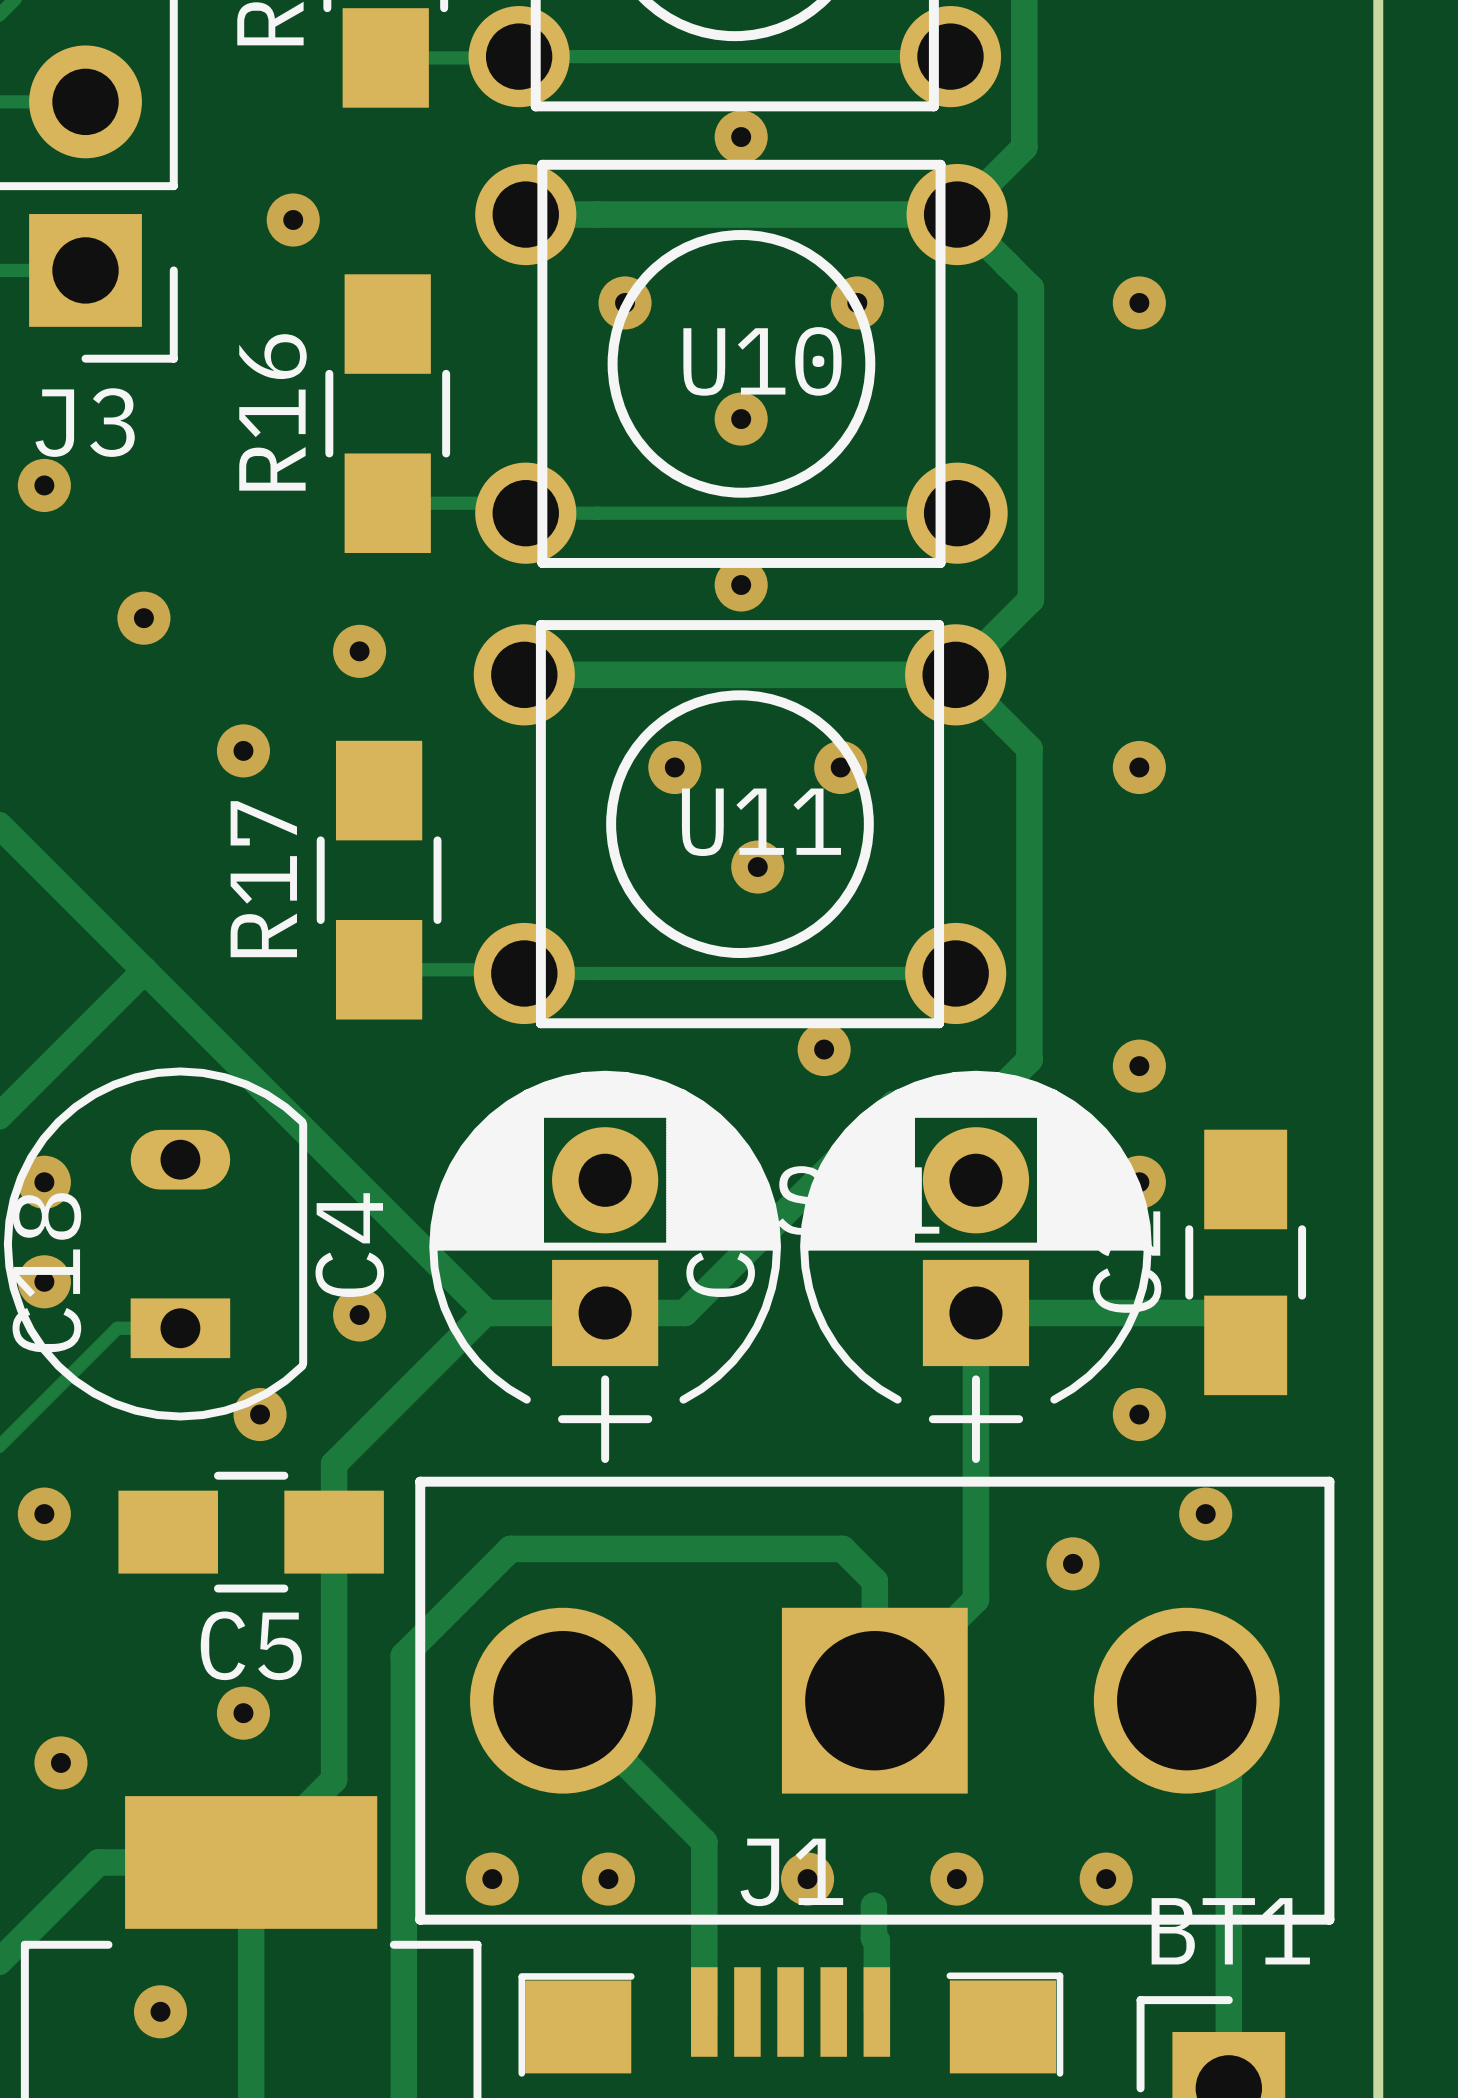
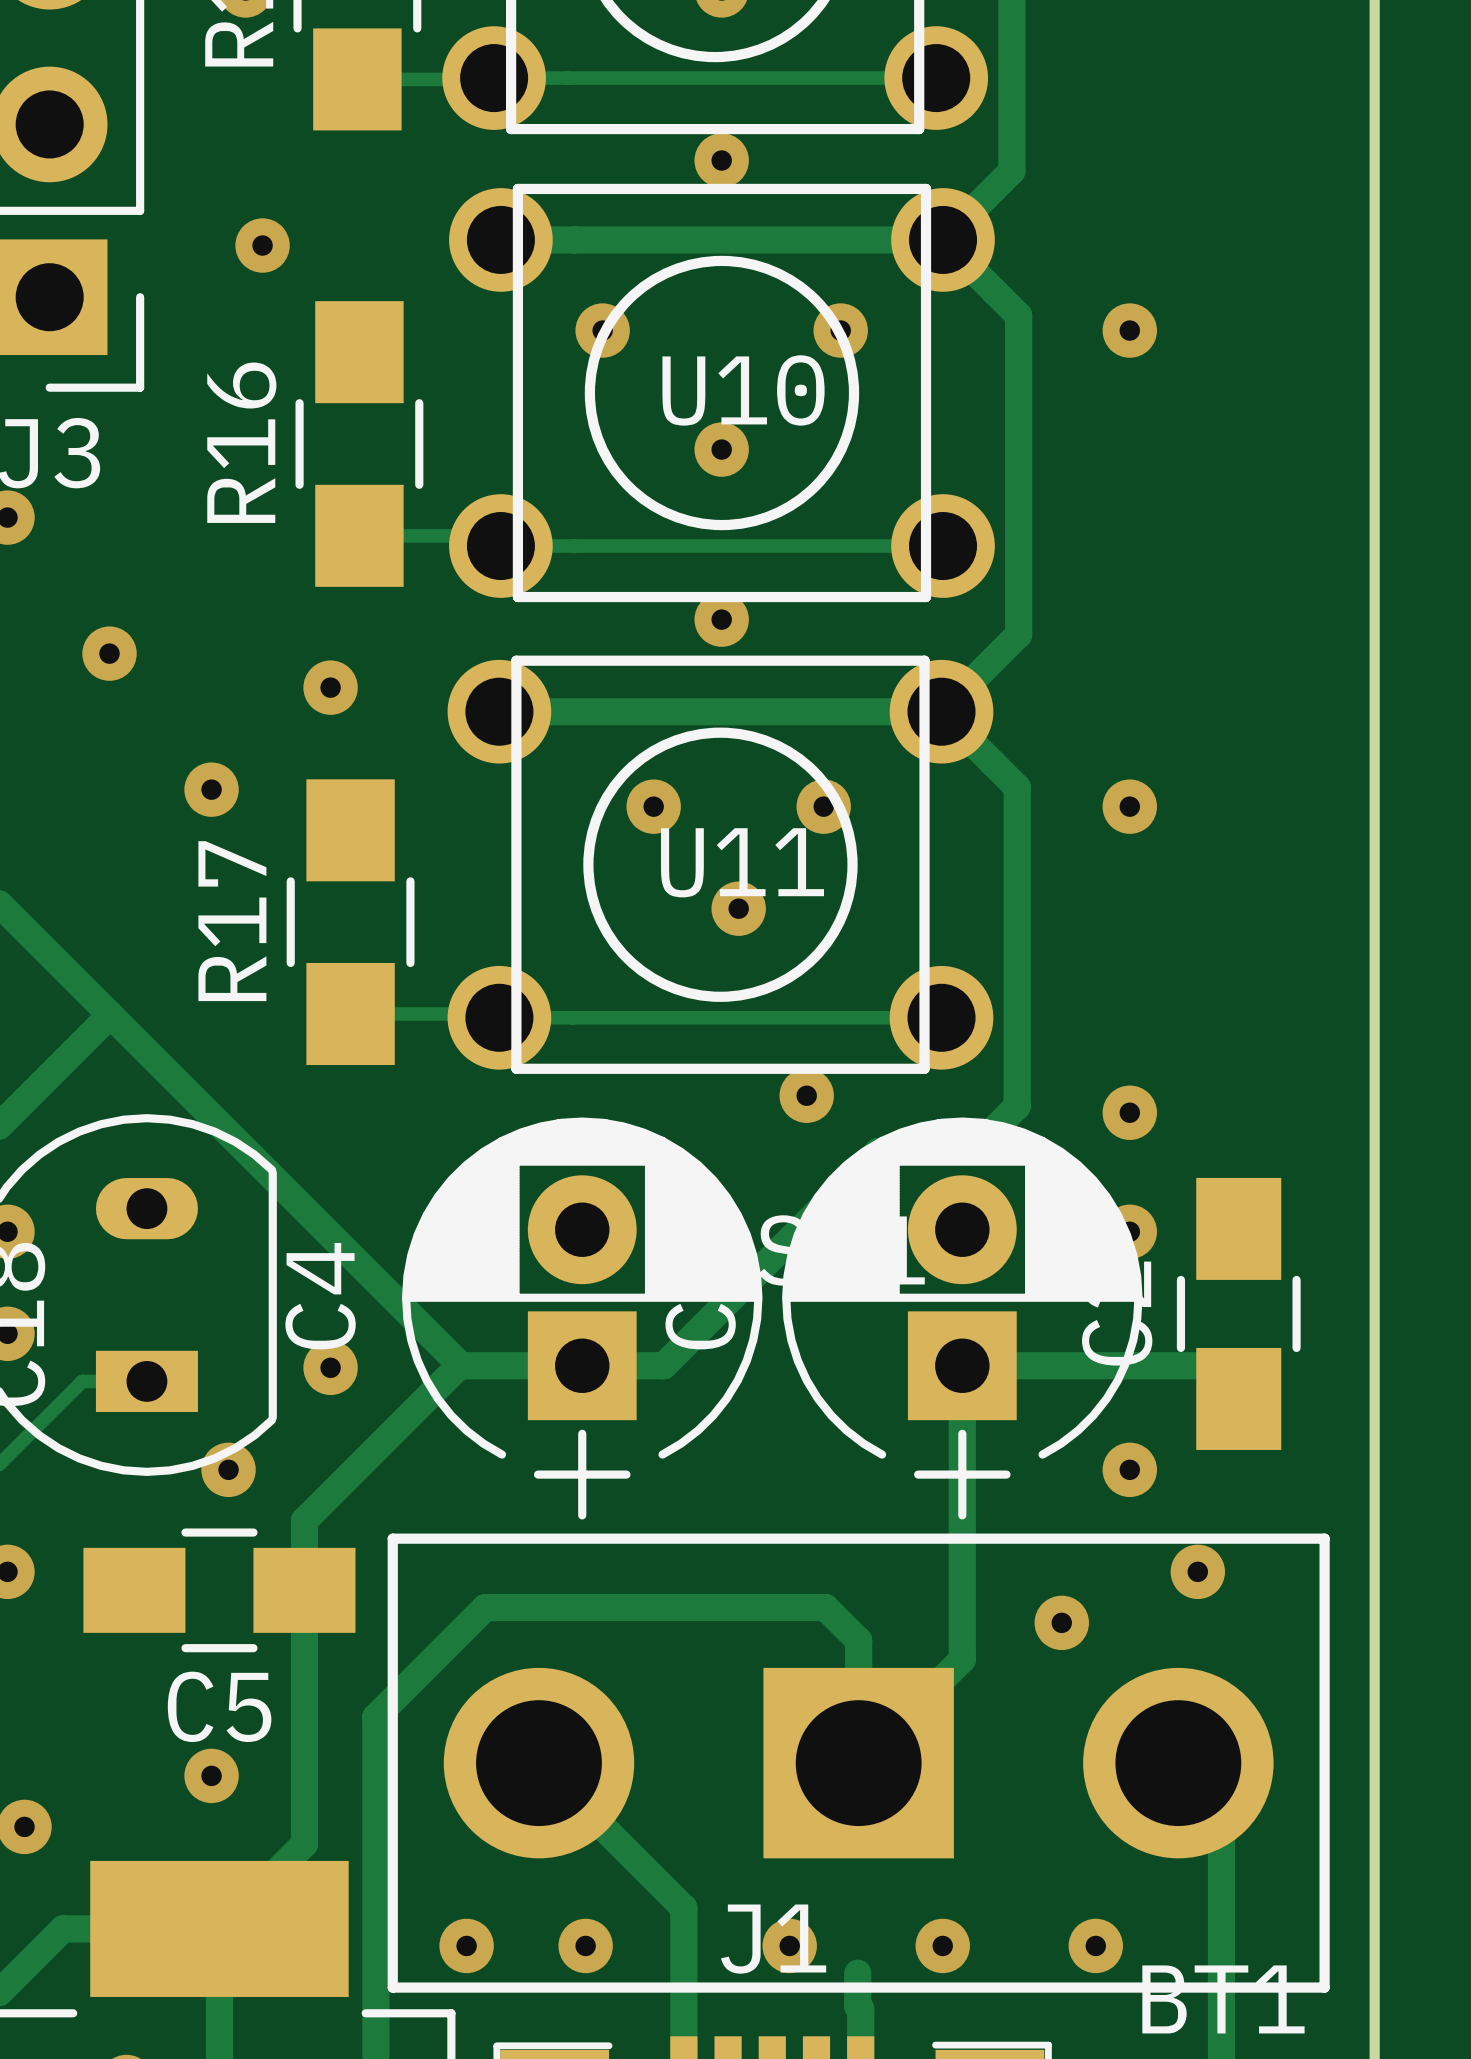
part footprint: [415, 1476, 1335, 1925] -> [387, 1533, 1330, 1993]

